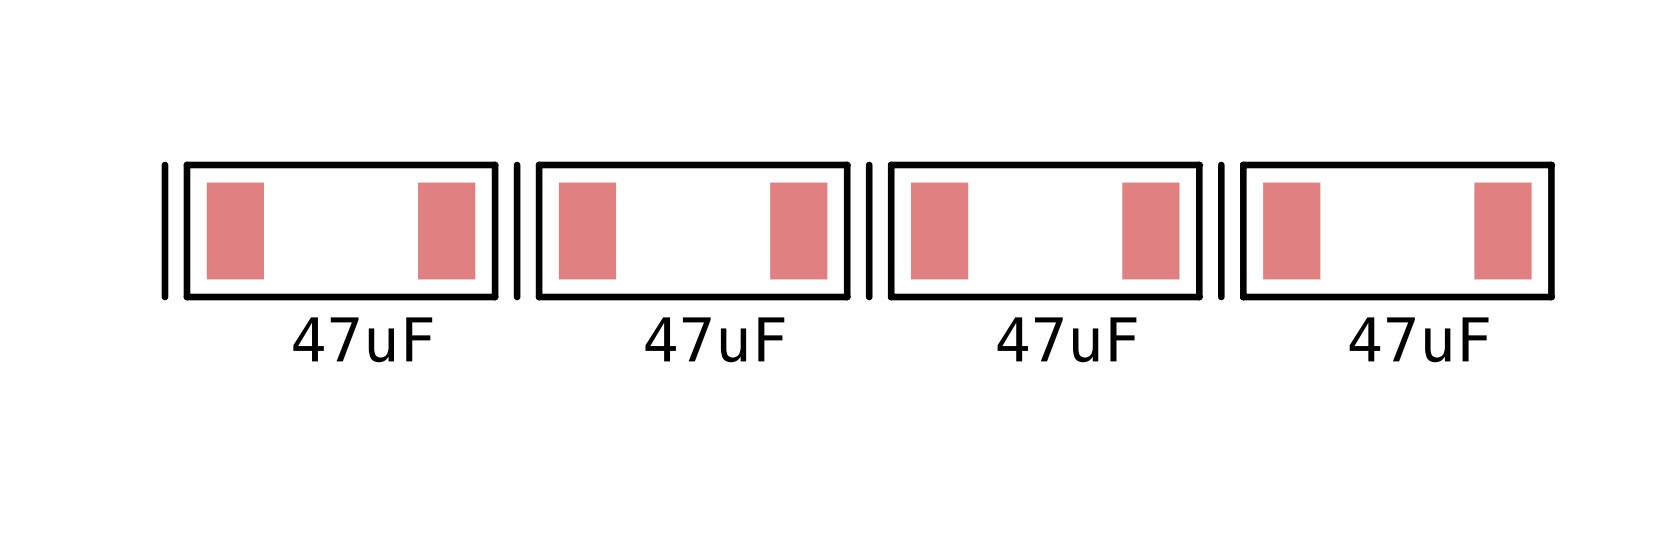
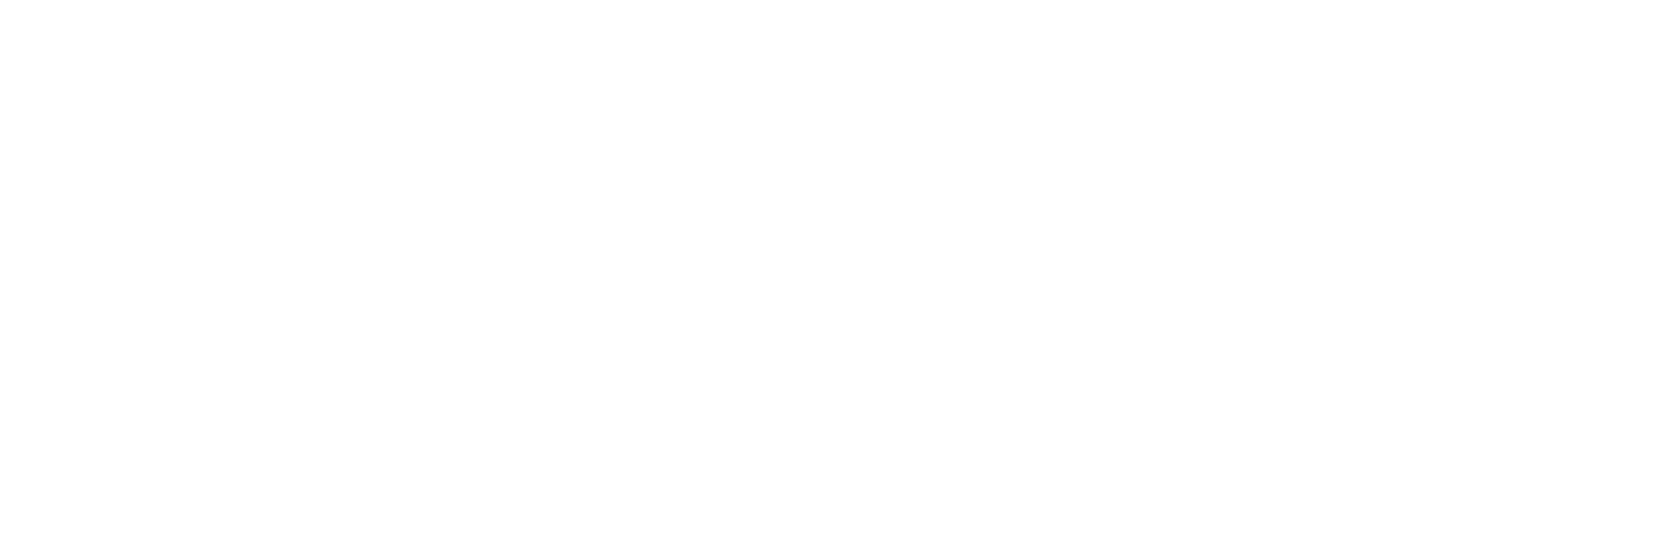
part: 47uF (330, 231) -> none
part: 47uF (682, 231) -> none
part: 47uF (1034, 231) -> none
part: 47uF (1386, 231) -> none

